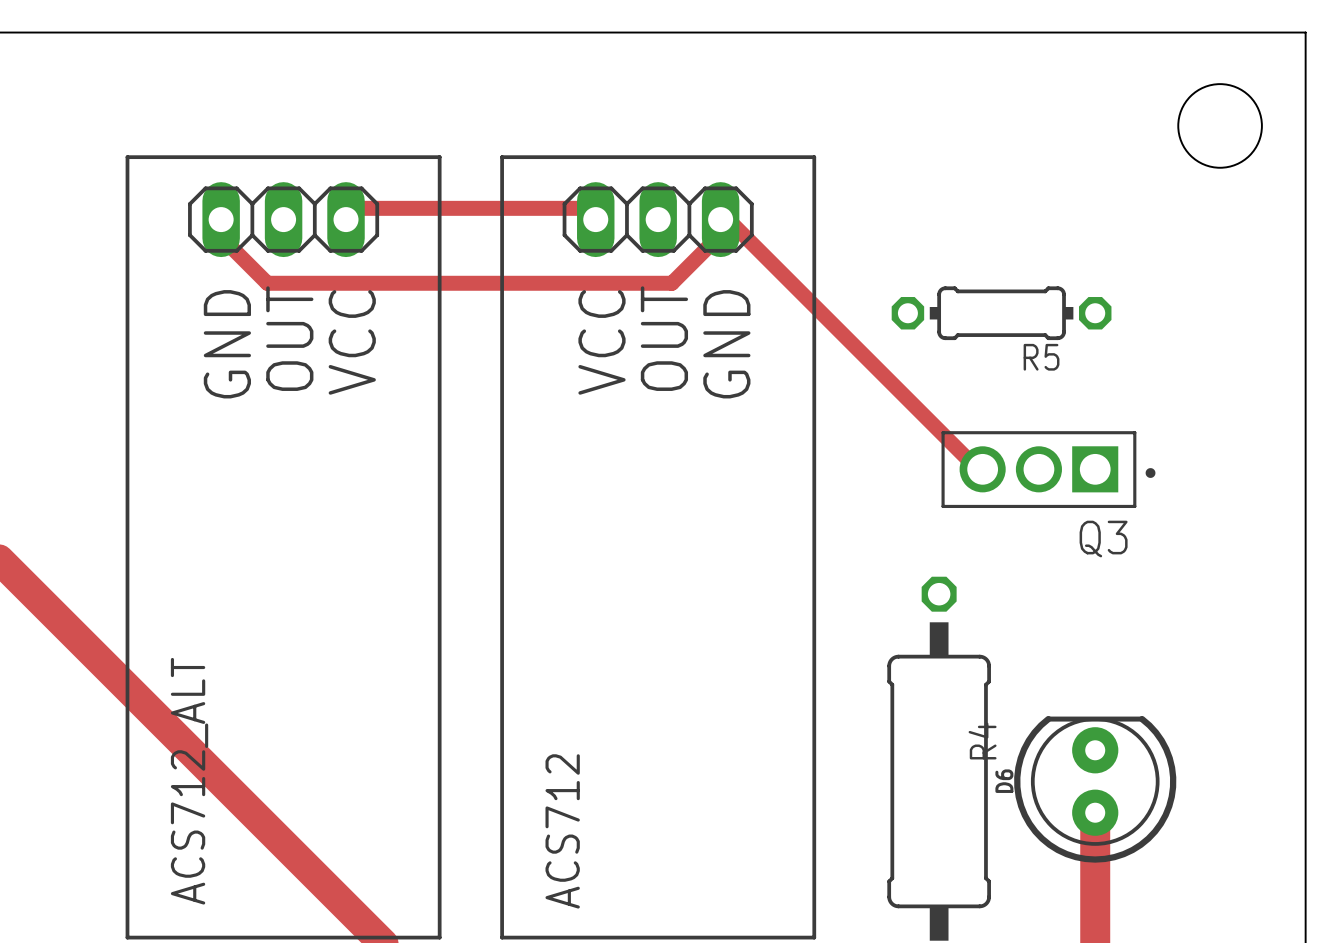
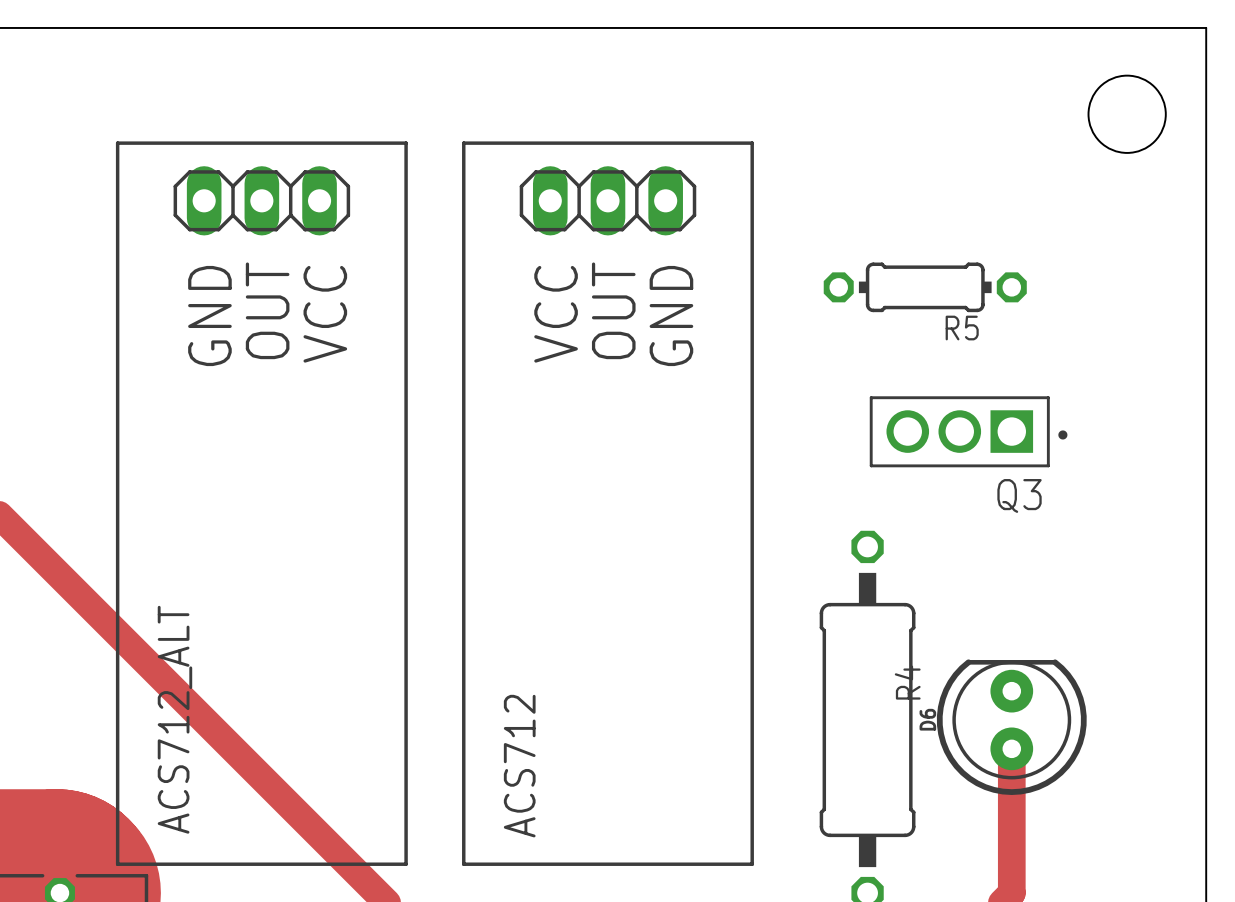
track: (221, 219) (222, 238) (267, 283) (671, 283) (731, 223) -> none
track: (346, 219) (357, 208) (582, 208) (595, 219) -> none
track: (731, 223) (971, 463) (982, 469) -> none

